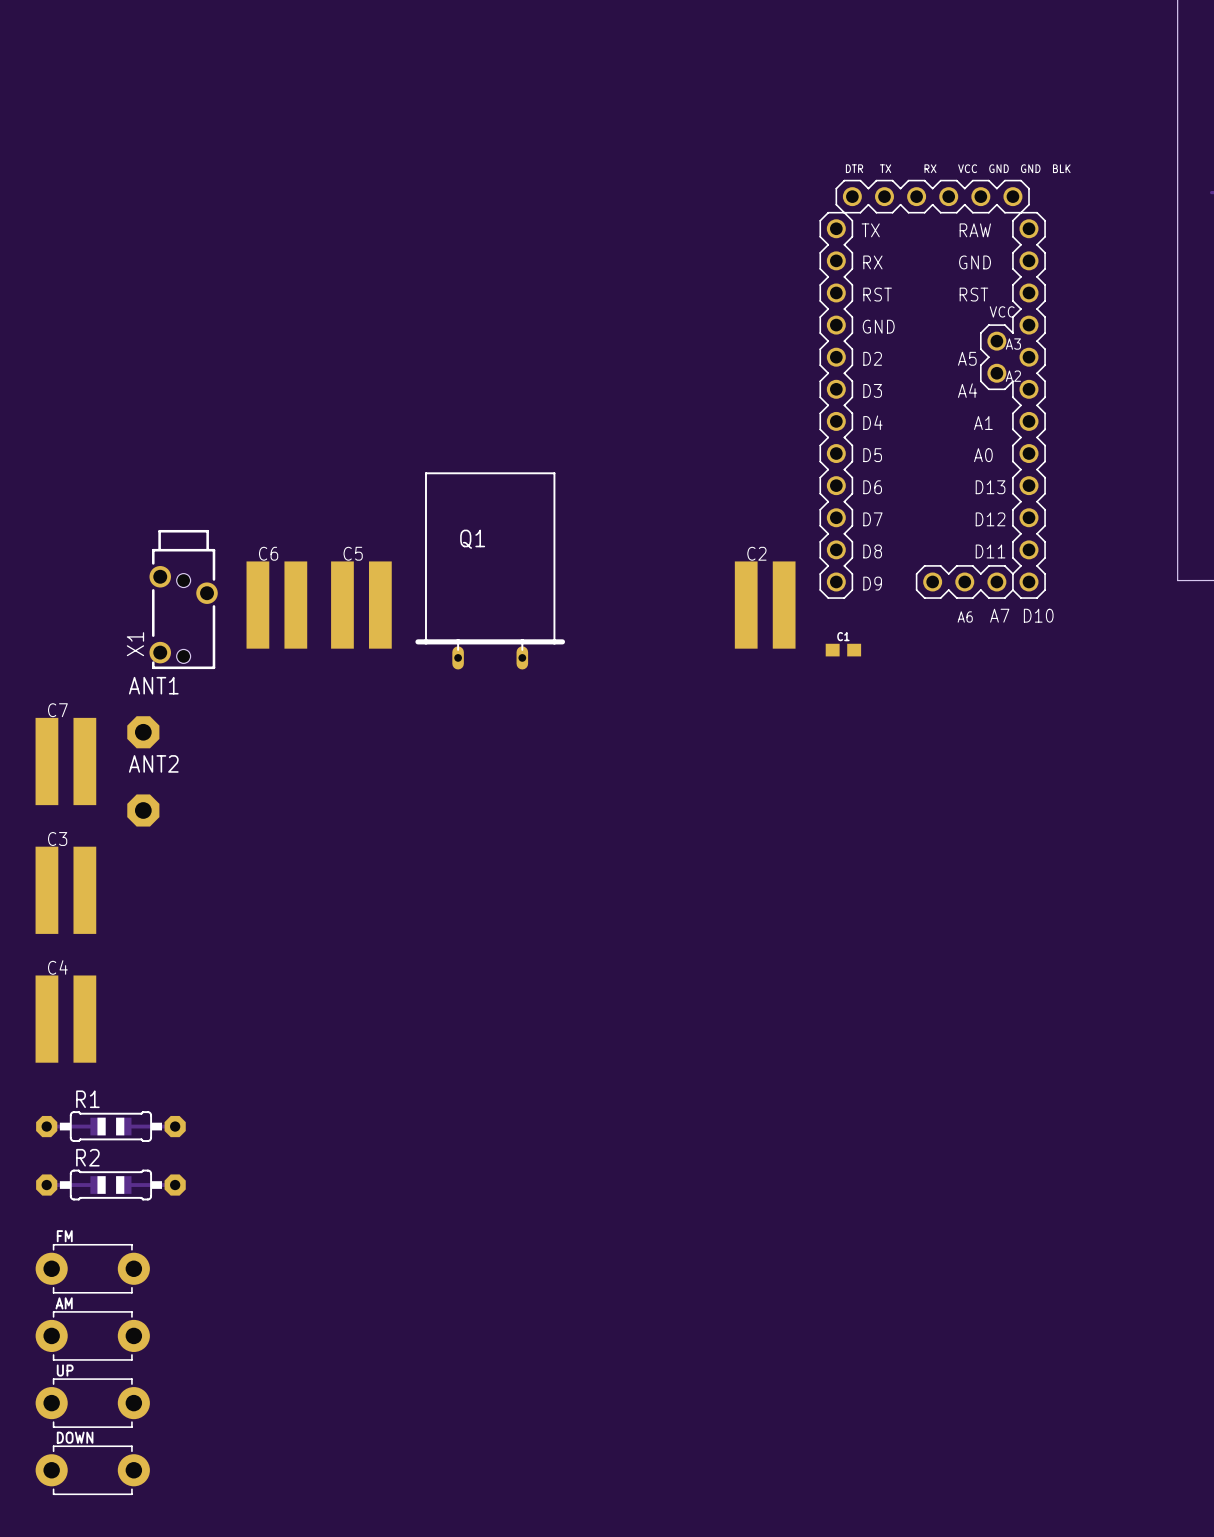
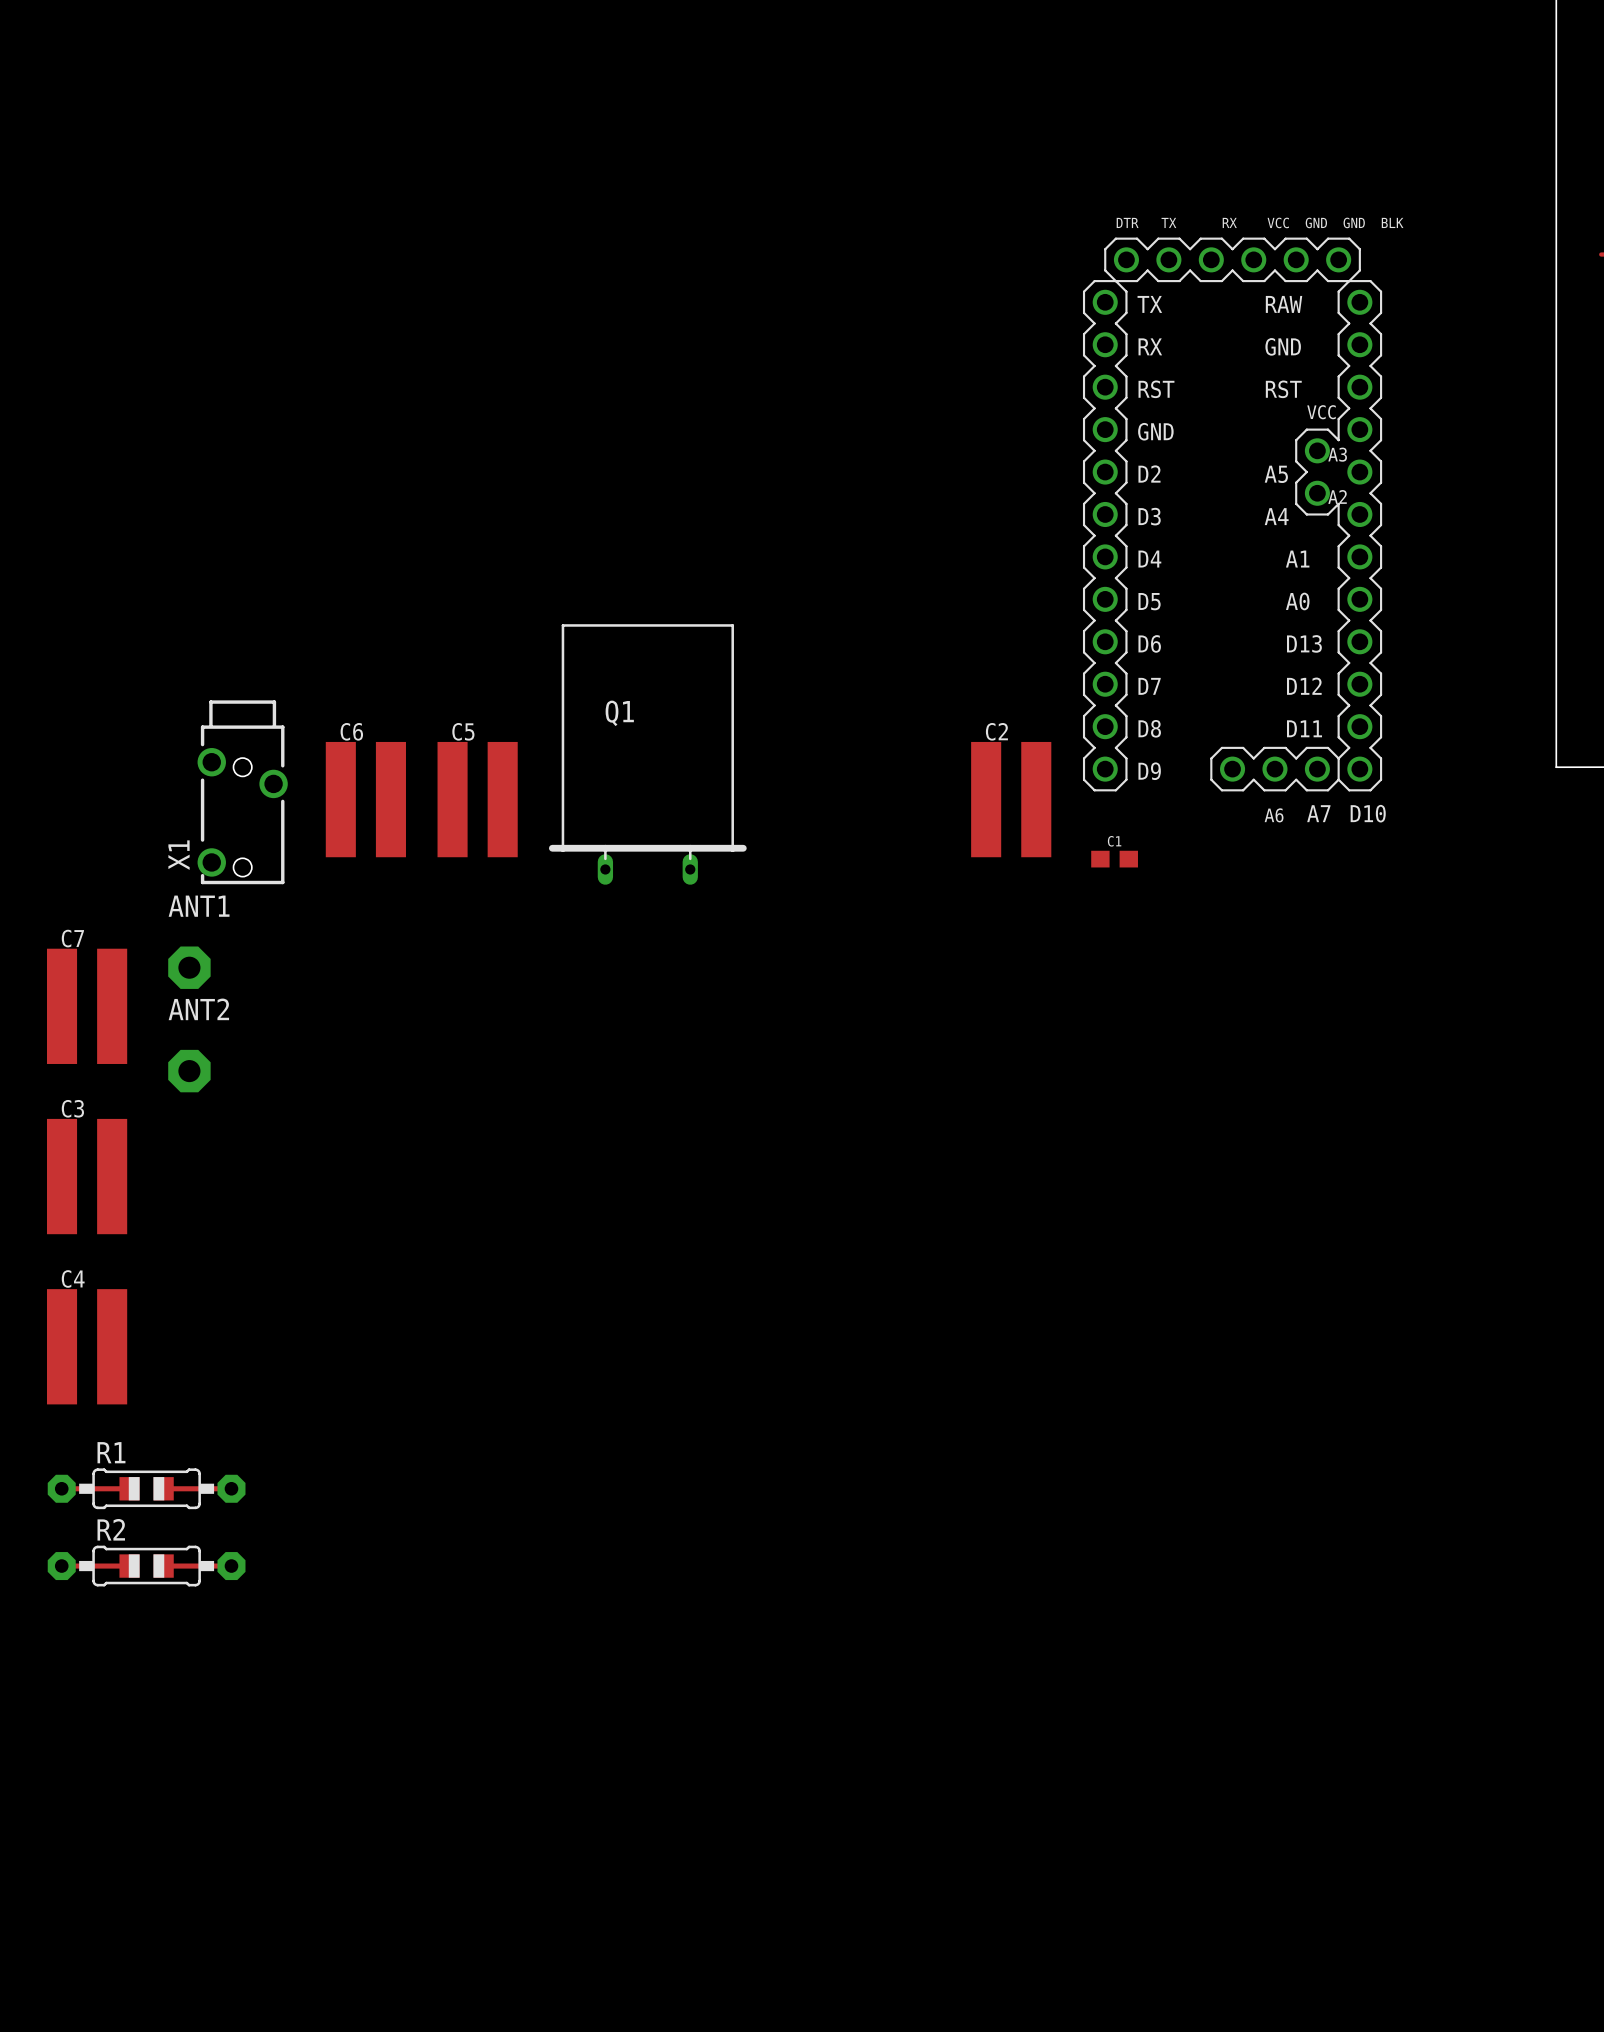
FM: (92, 1268) -> none
AM: (92, 1335) -> none
UP: (92, 1403) -> none
DOWN: (92, 1470) -> none

